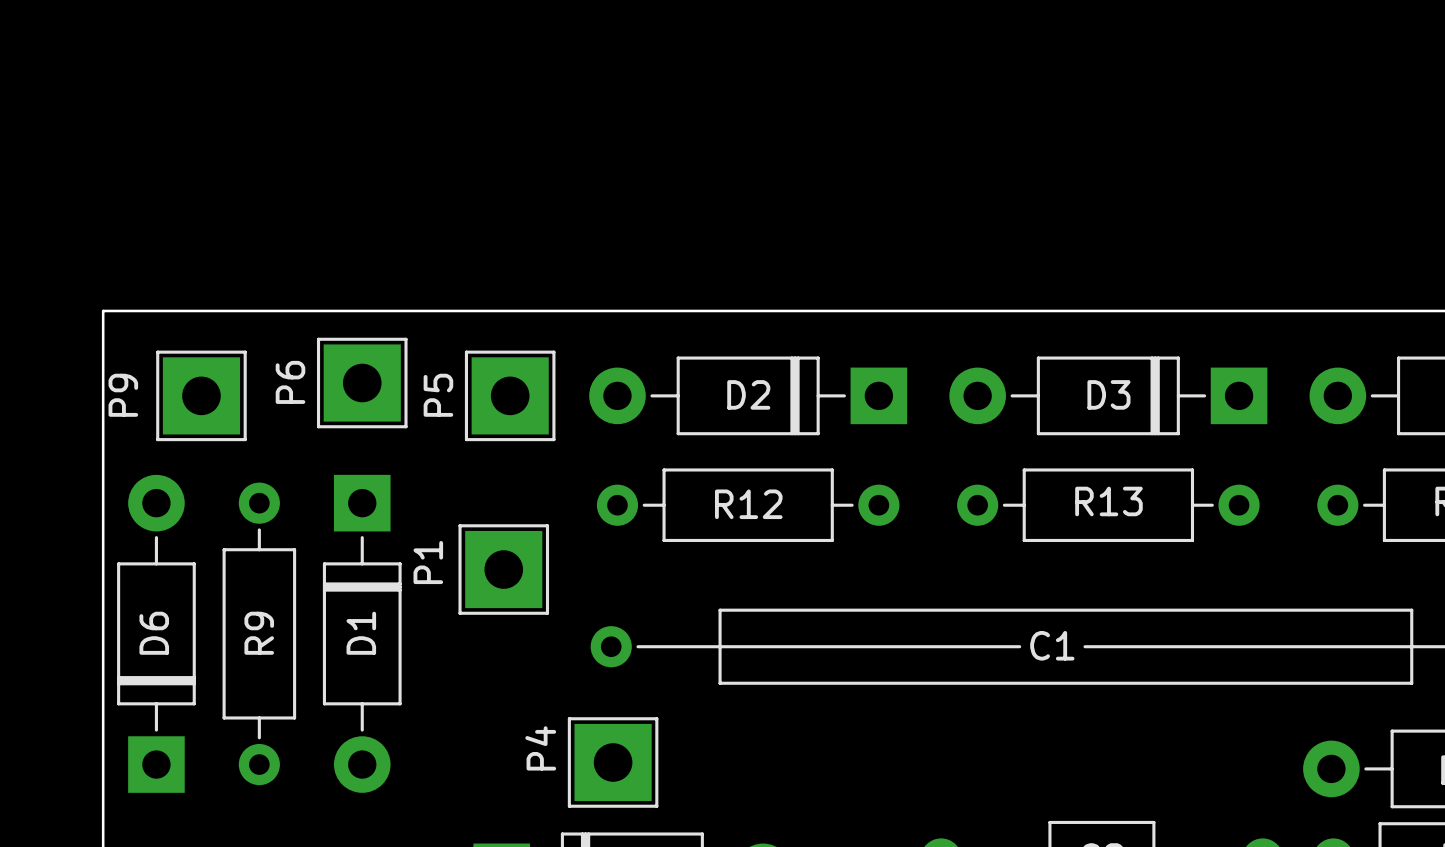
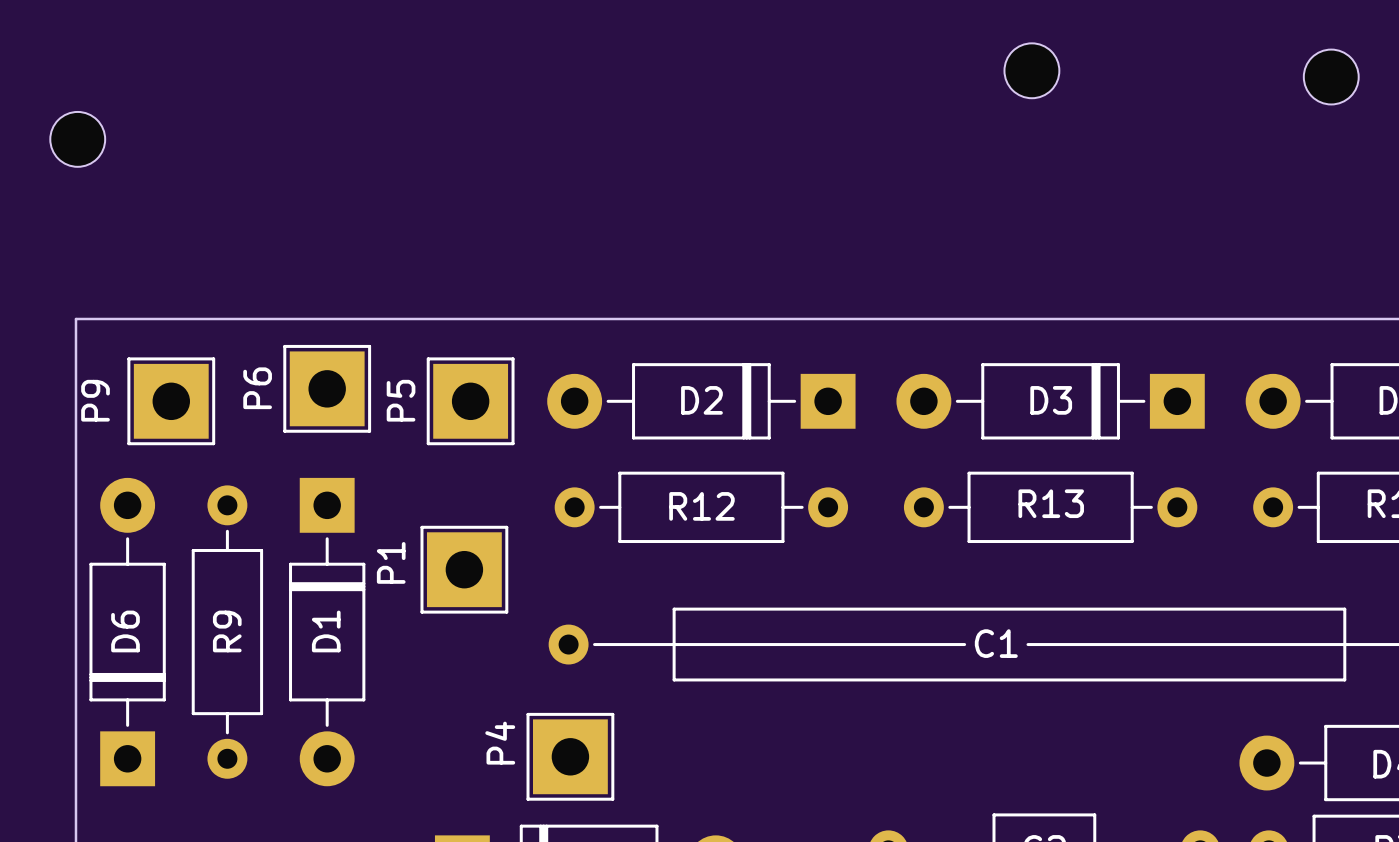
part: none -> (1031, 70)
part: none -> (1331, 77)
part: none -> (77, 139)

